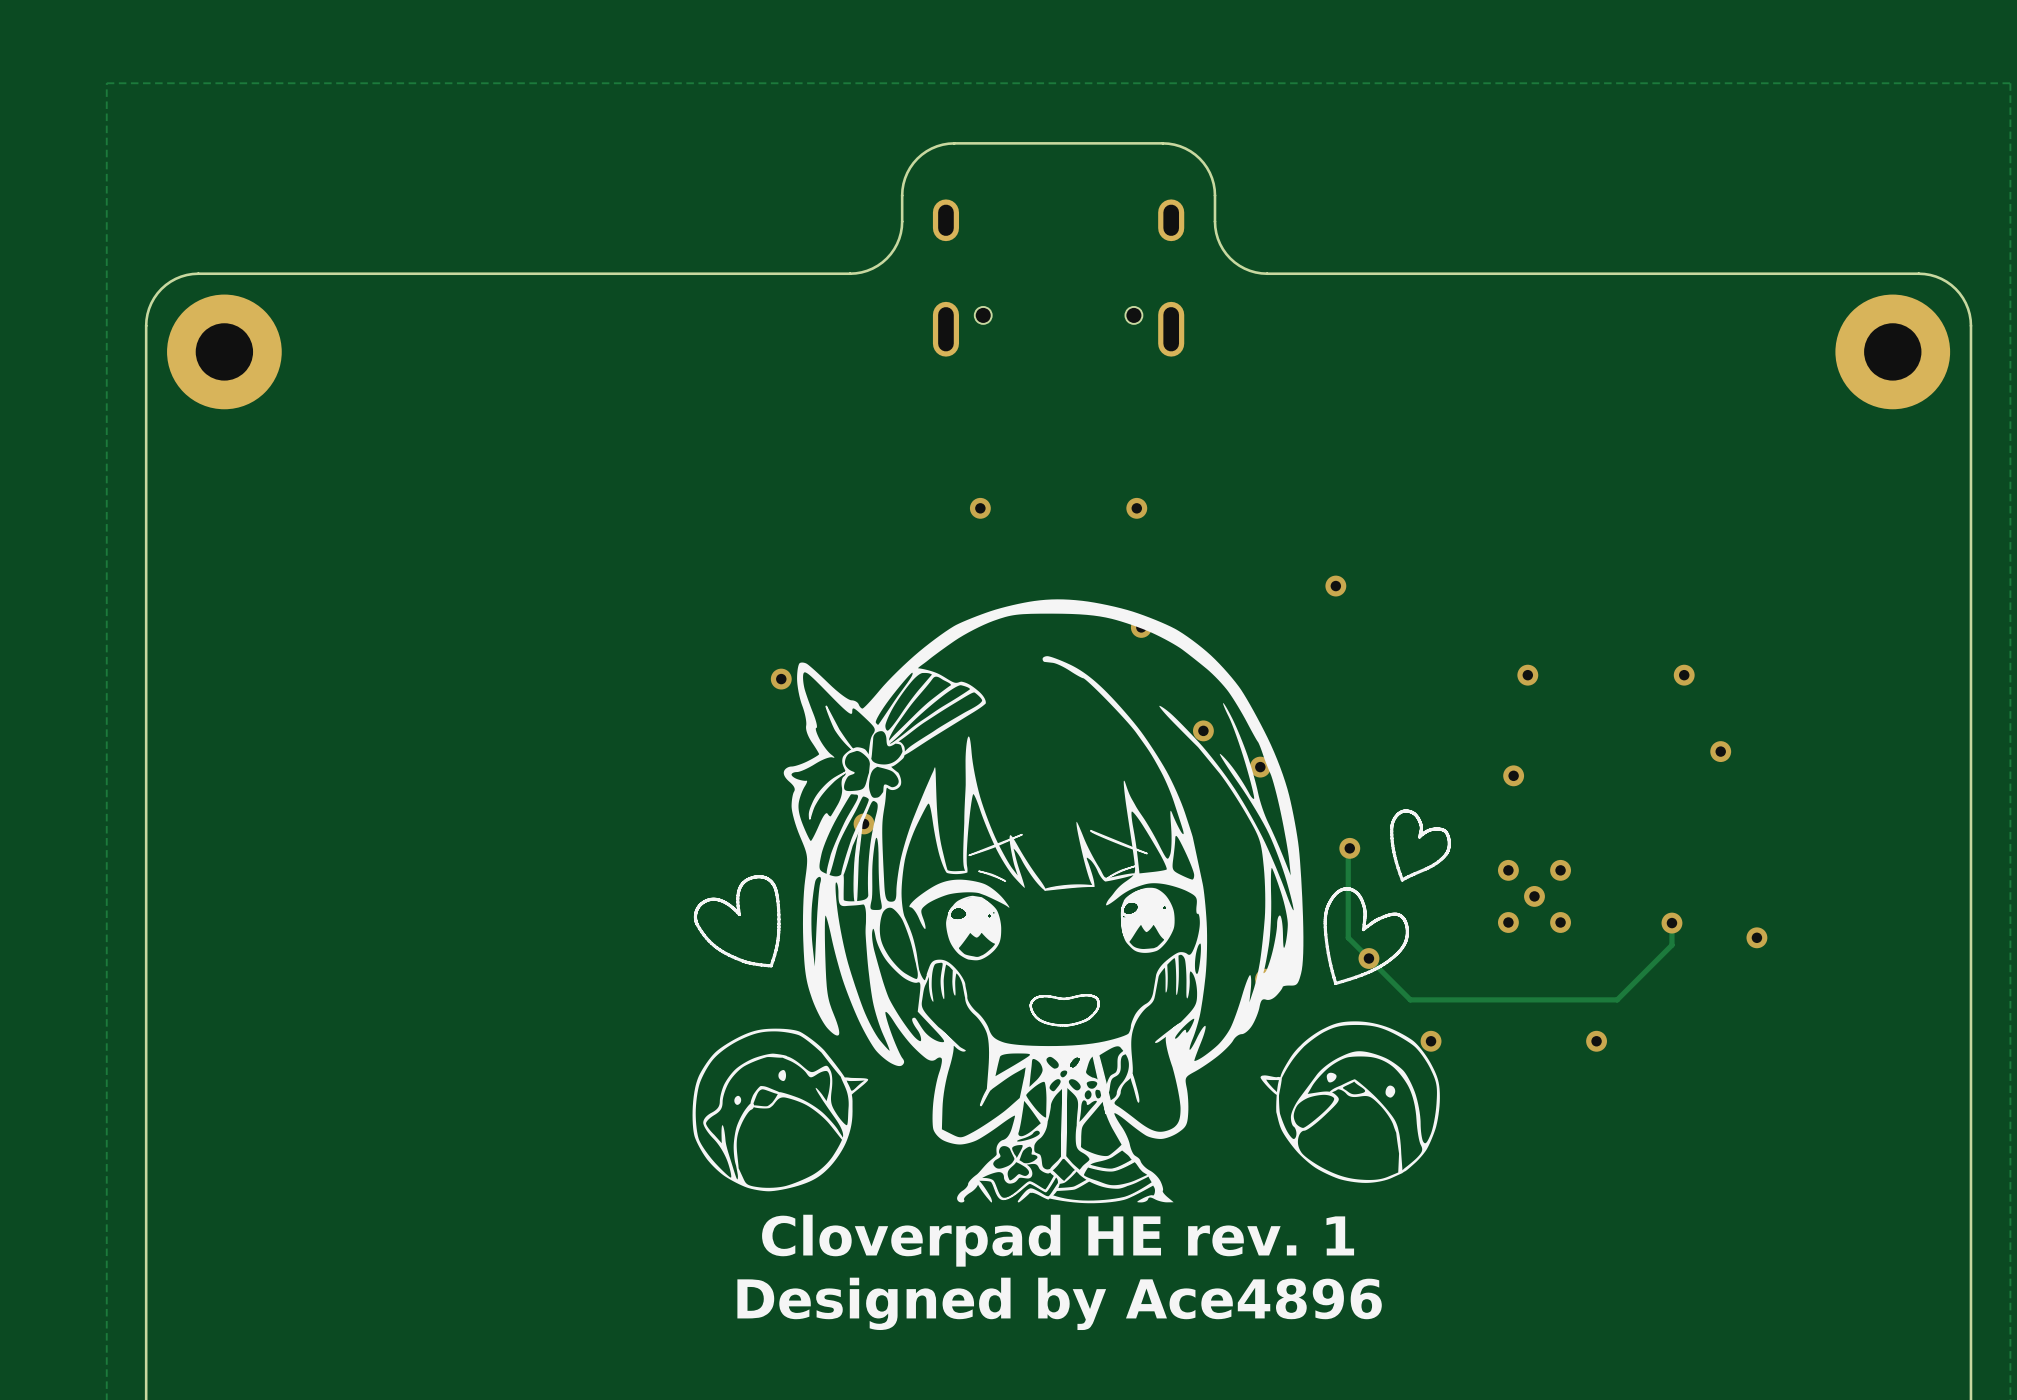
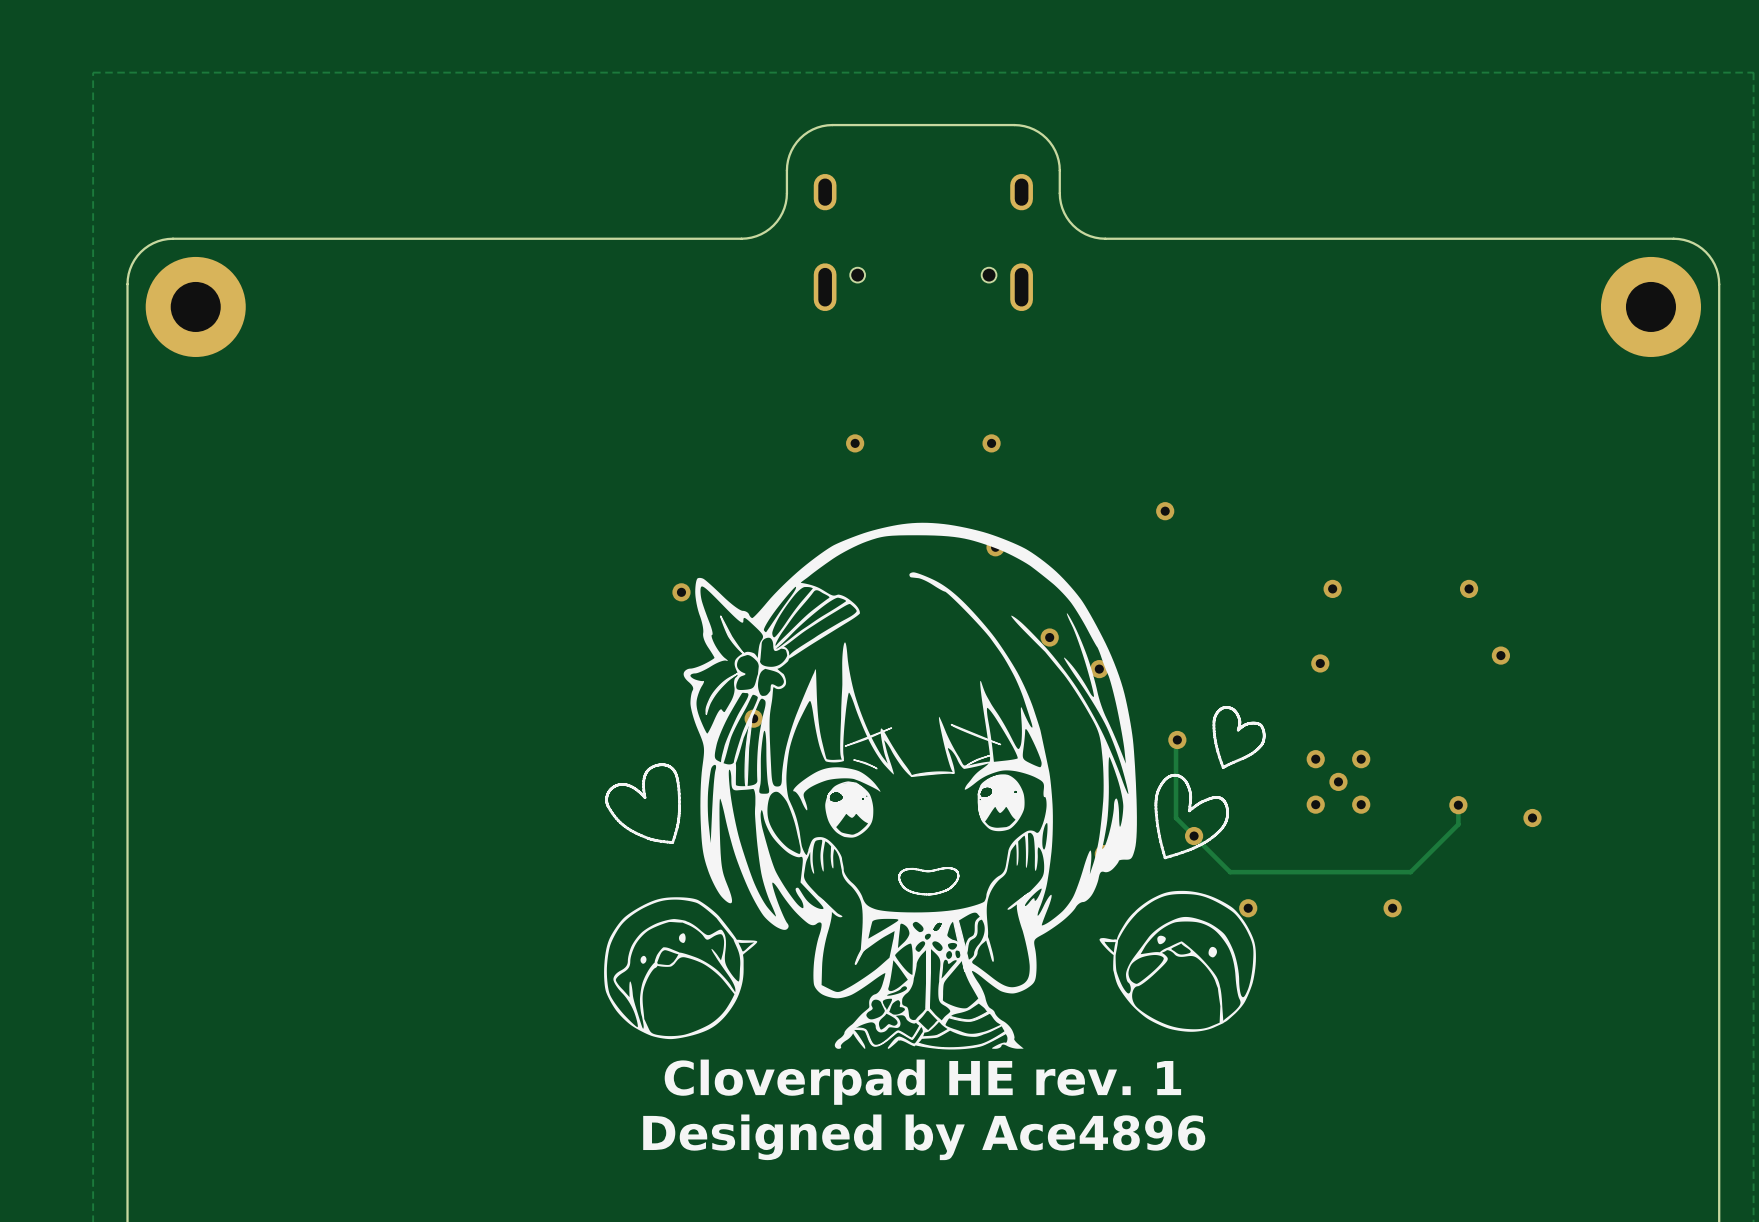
via position: (1513, 775) -> (1320, 663)

